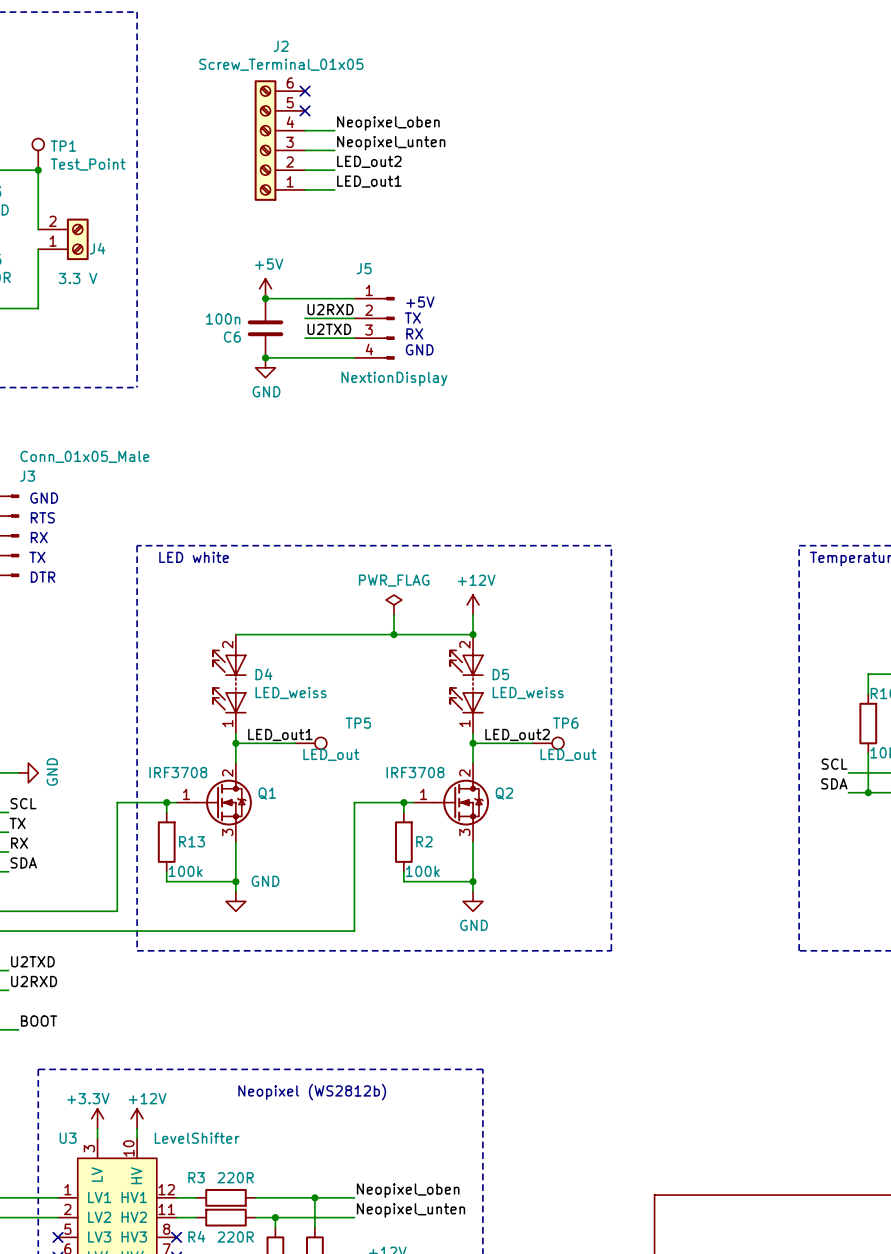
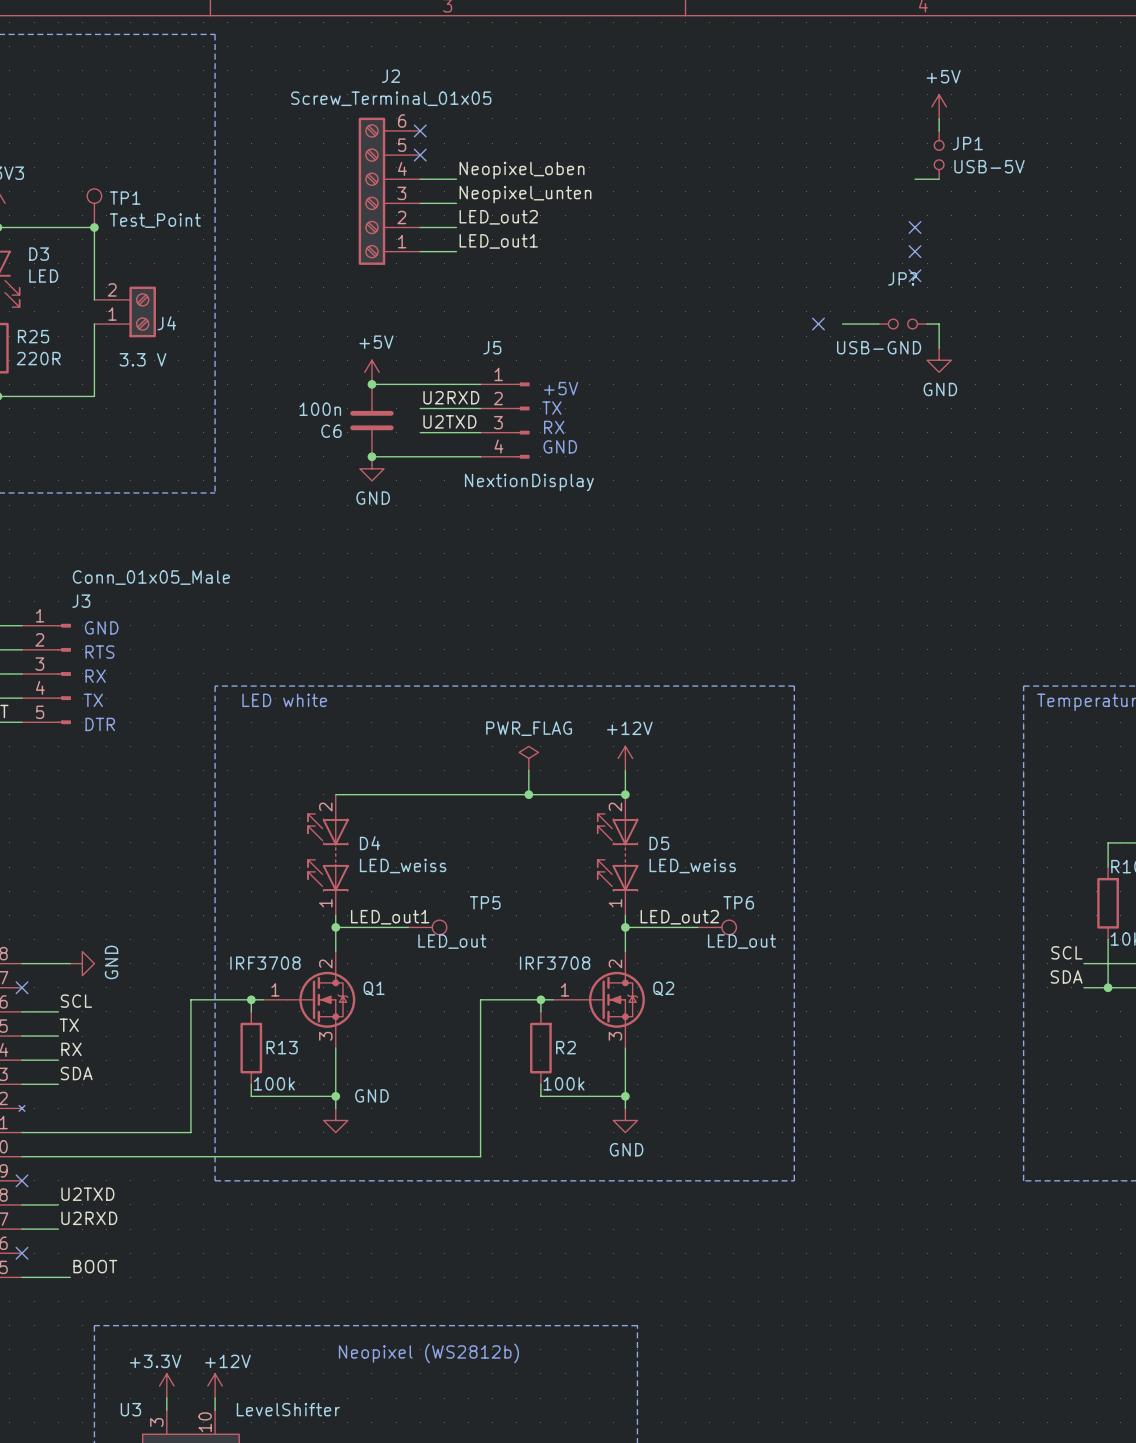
power symbol: none -> +5V (939, 106)
wire: none -> (939, 118) (939, 130)
JP1: none -> USB-5V (939, 155)
wire: none -> (915, 179) (939, 179)
no-connect mark: none -> (915, 227)
no-connect mark: none -> (915, 251)
no-connect mark: none -> (915, 275)
no-connect mark: none -> (818, 324)
wire: none -> (842, 324) (878, 324)
JP?: none -> USB-GND (902, 324)
wire: none -> (927, 324) (939, 324) (939, 348)
power symbol: none -> GND (939, 360)

